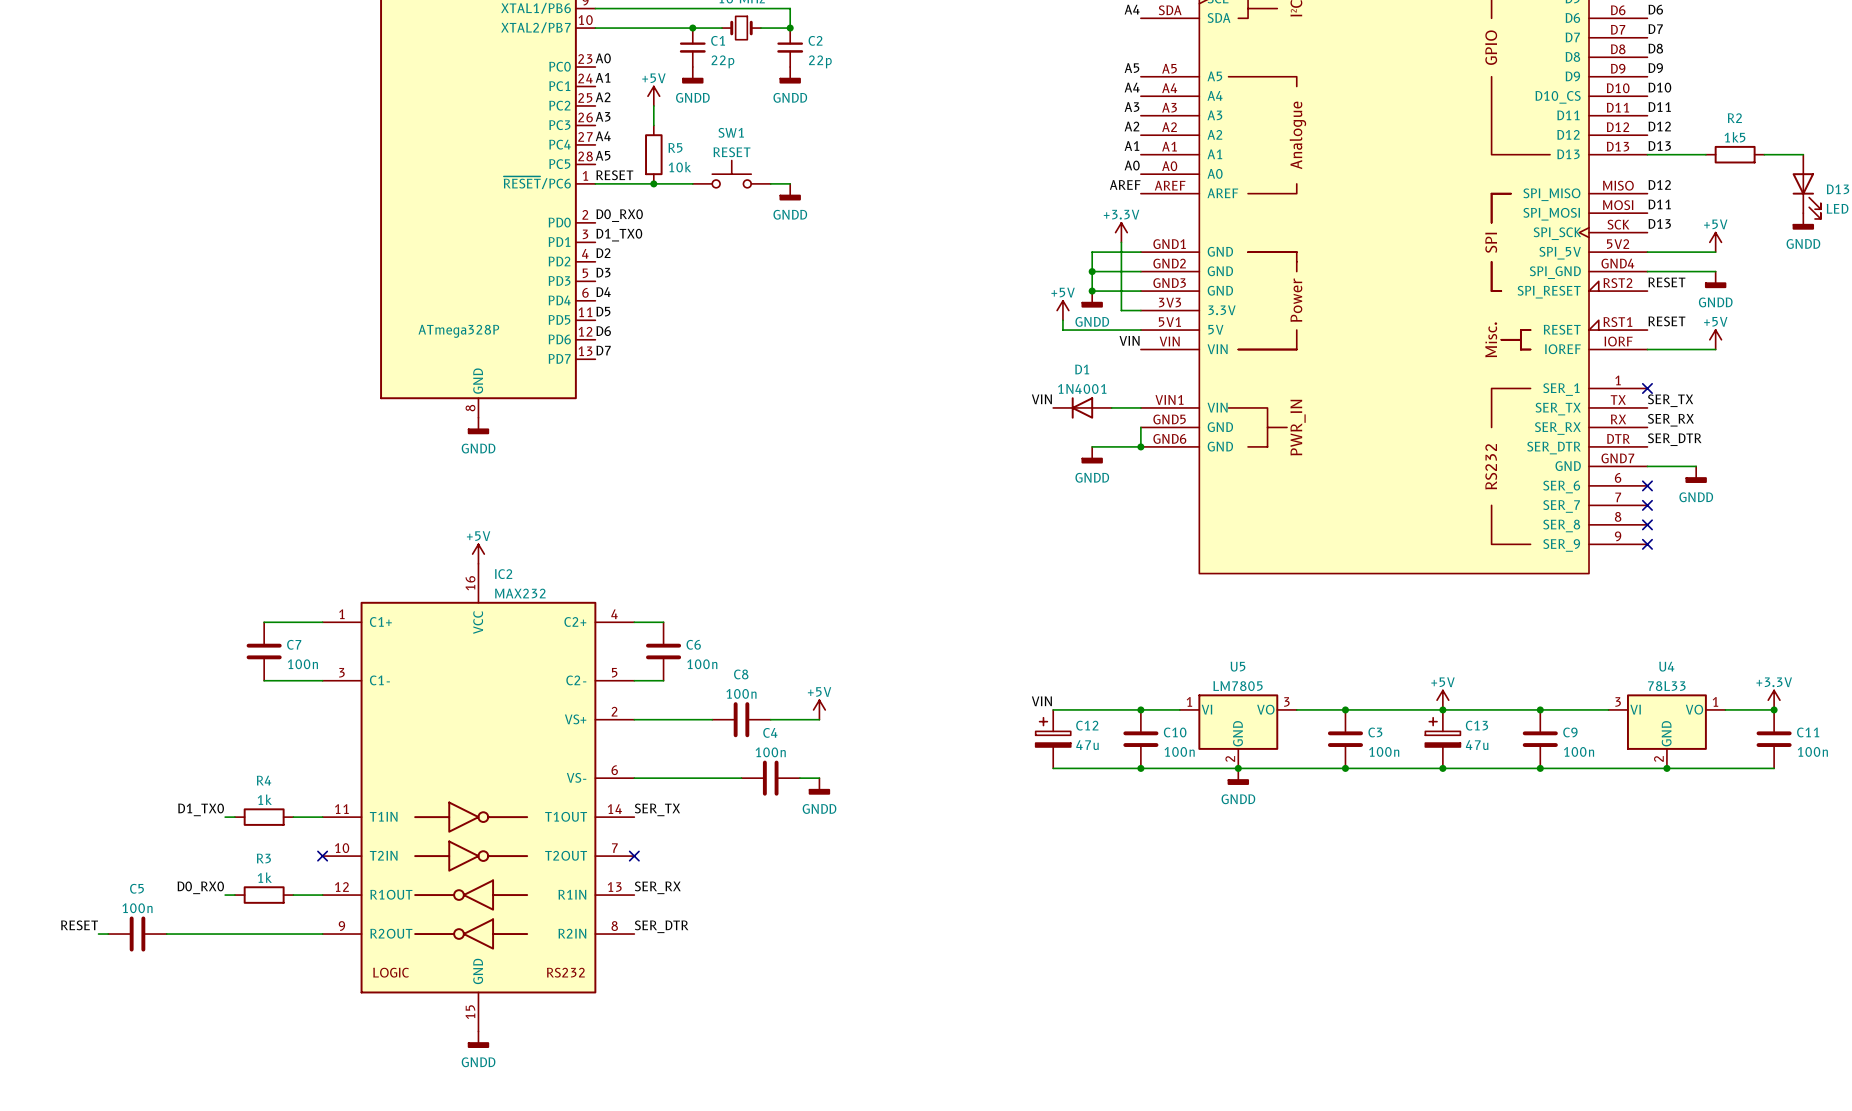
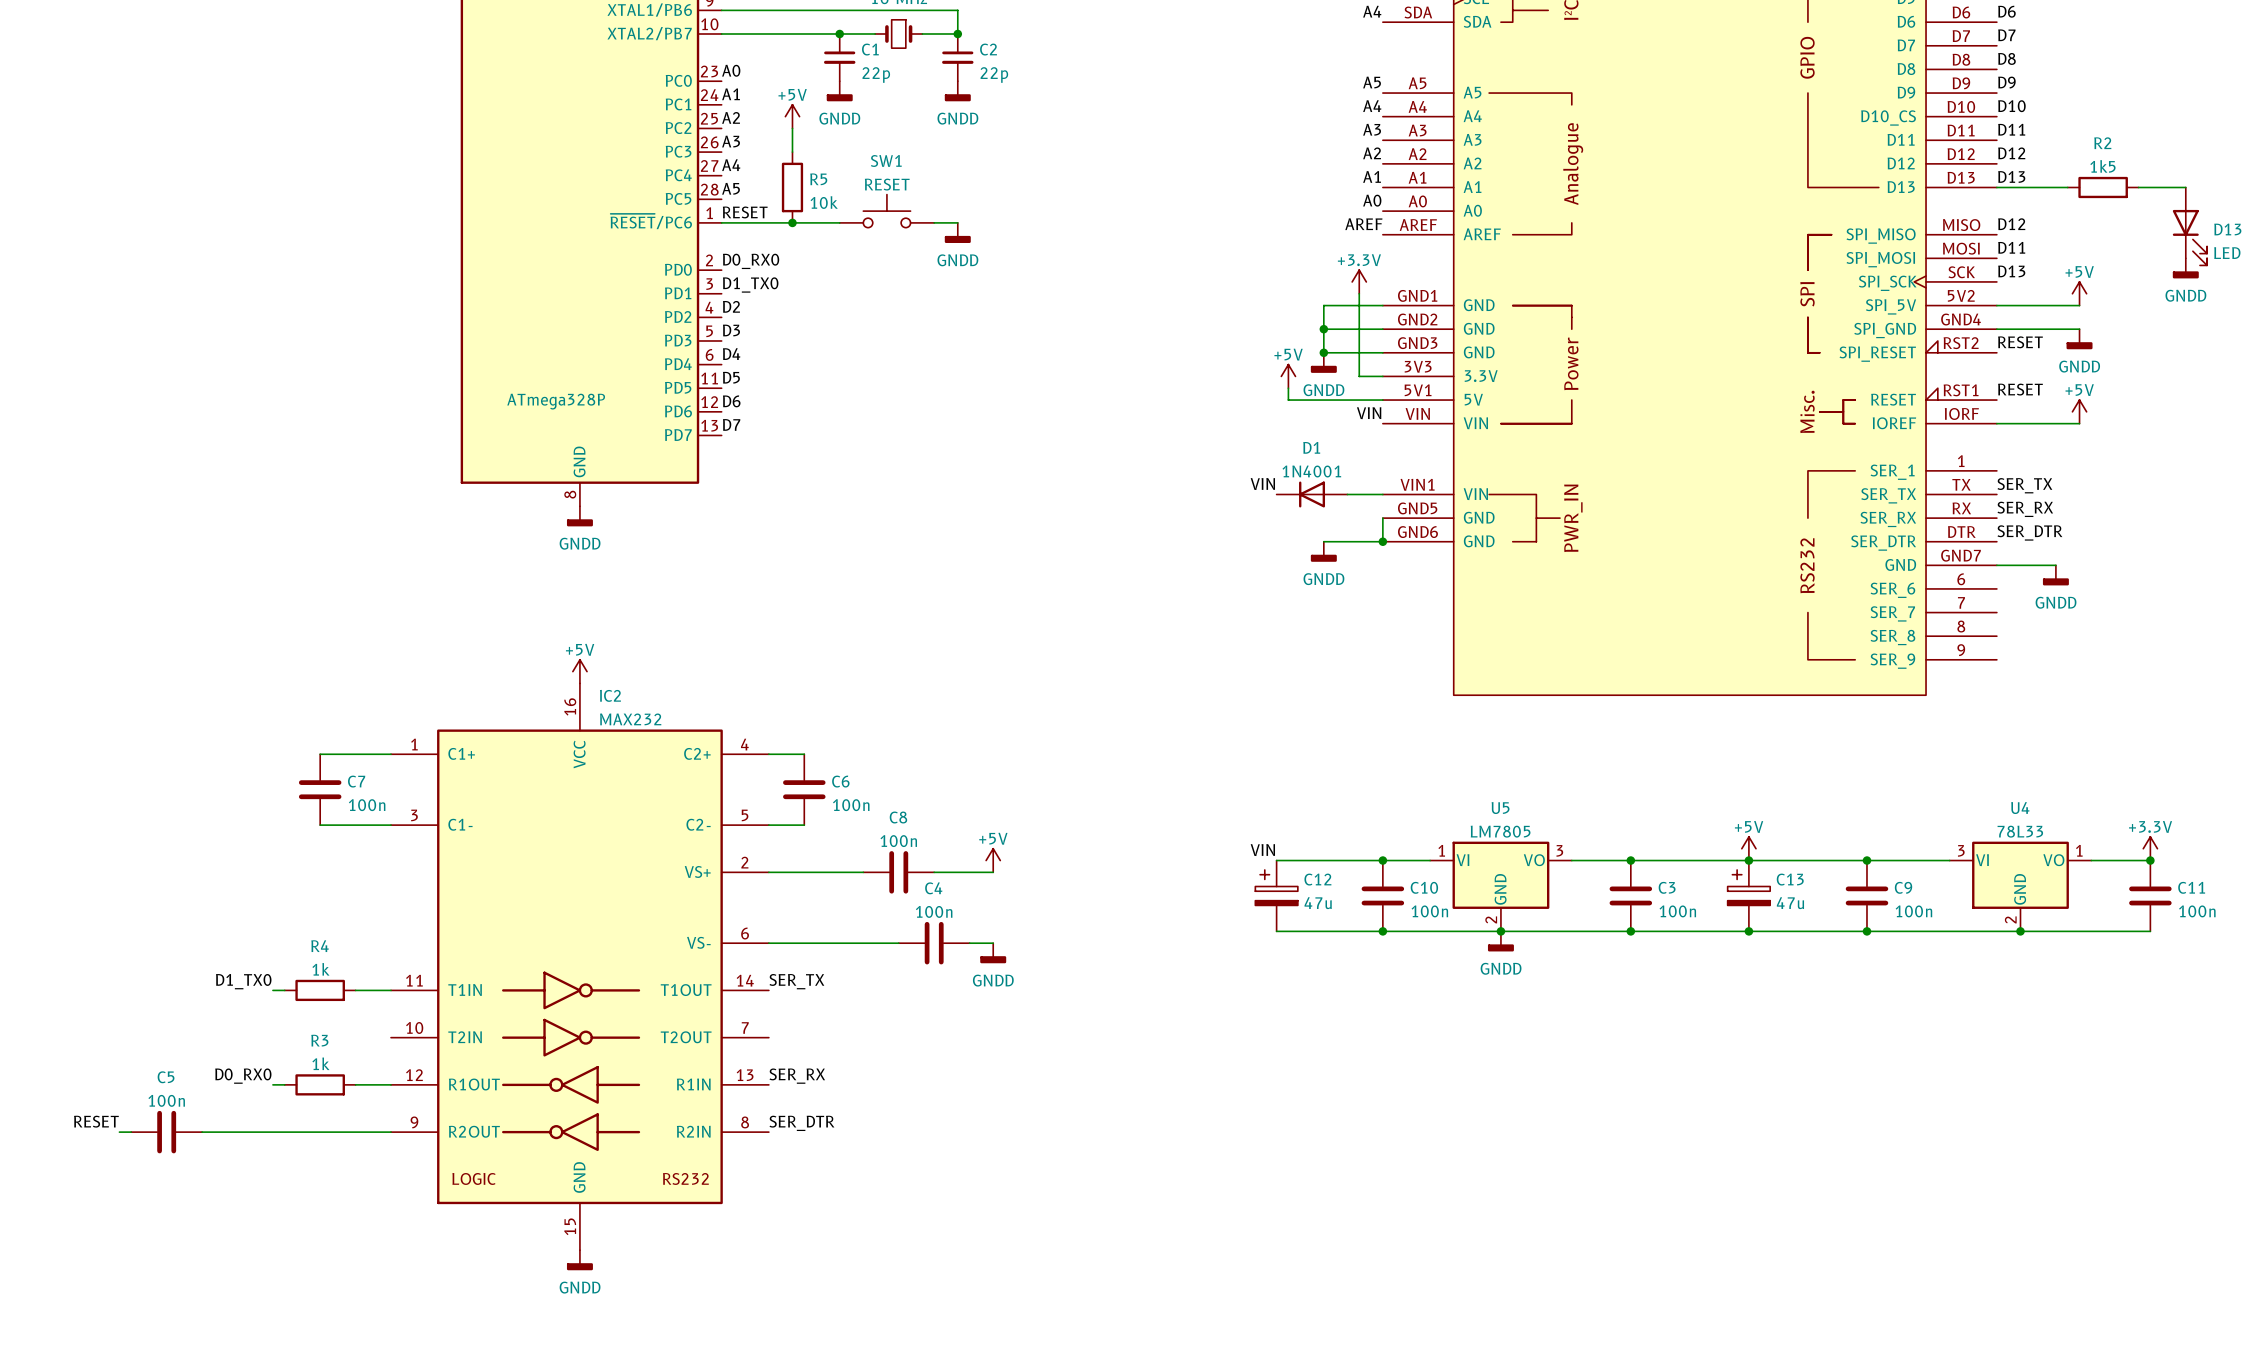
no-connect mark: (1647, 388) -> none
no-connect mark: (1647, 485) -> none
no-connect mark: (1647, 505) -> none
no-connect mark: (1647, 524) -> none
no-connect mark: (1647, 544) -> none
no-connect mark: (322, 856) -> none
no-connect mark: (634, 856) -> none

